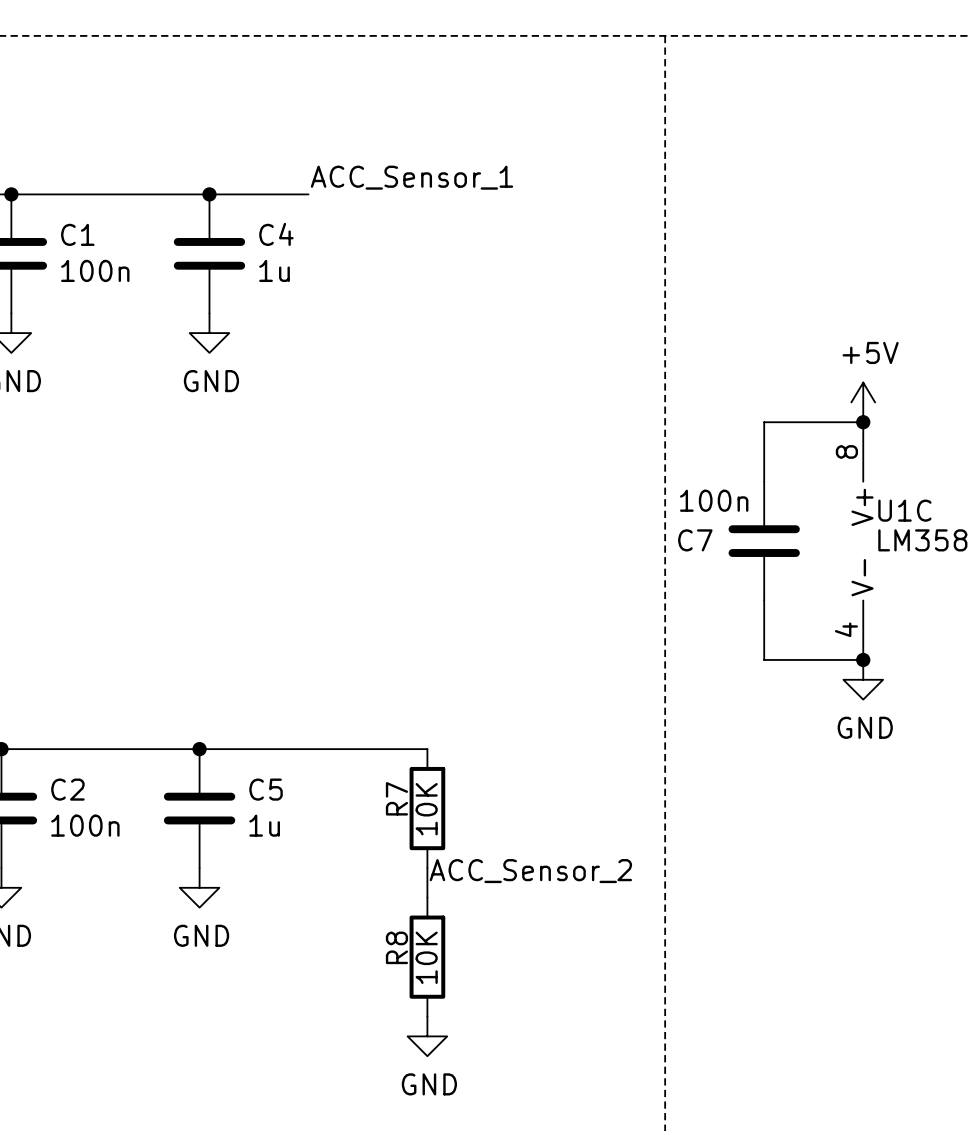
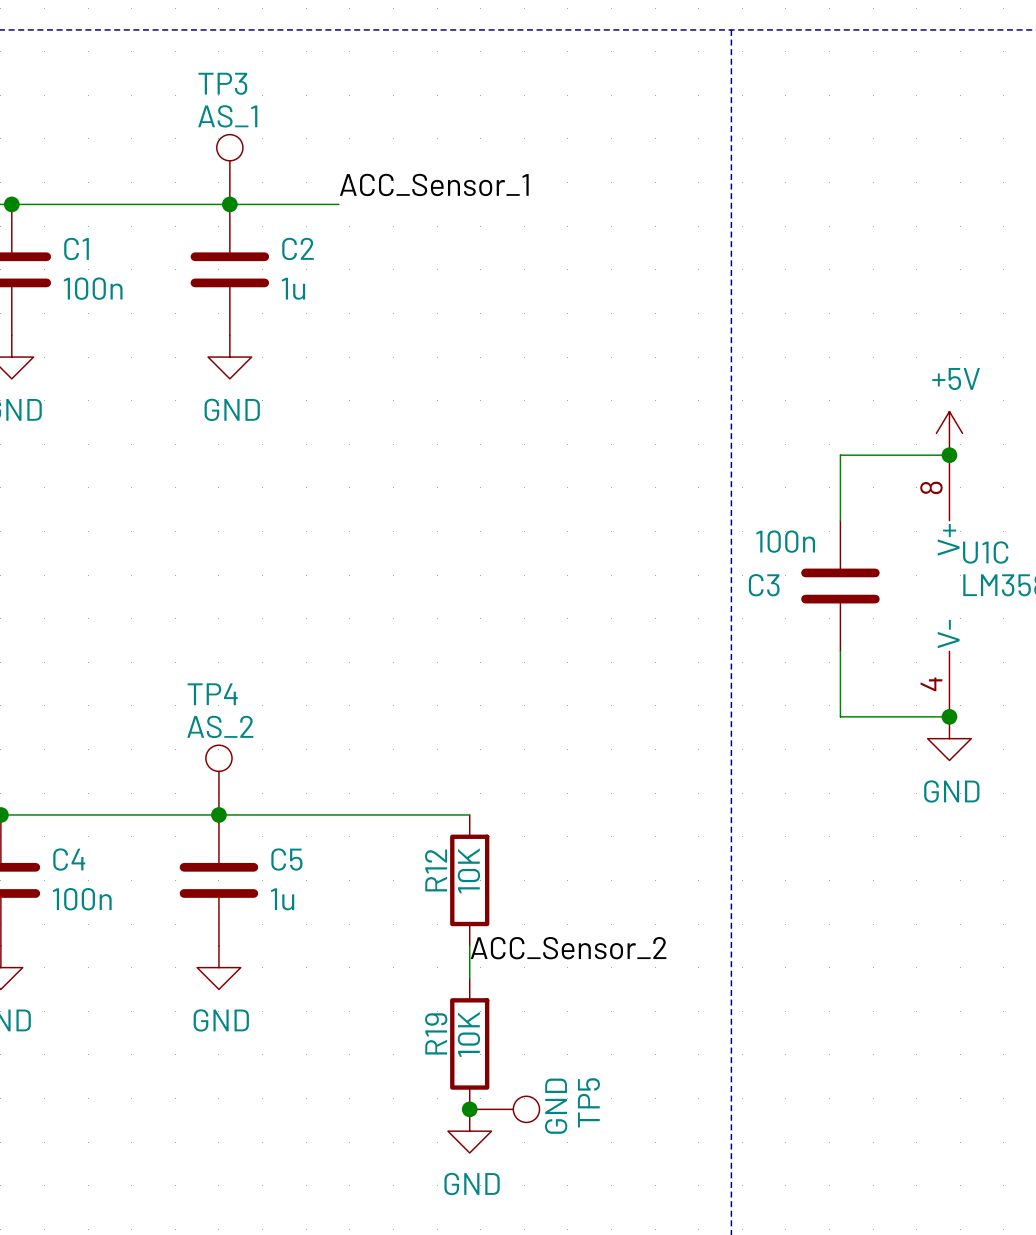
TP3: none -> AS_1 (229, 169)
C4 name: C4 (276, 234) -> C2 (298, 248)
C7 name: C7 (695, 540) -> C3 (764, 585)
TP4: none -> AS_2 (218, 780)
C2 name: C2 (67, 789) -> C4 (69, 859)
R7 name: R7 (396, 798) -> R12 (436, 870)
R8 name: R8 (396, 947) -> R19 (436, 1033)
junction: none -> (469, 1109)
TP5: none -> GND (504, 1109)

